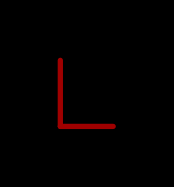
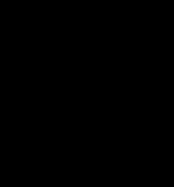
track: (60, 60) (60, 126) (113, 126) -> none

